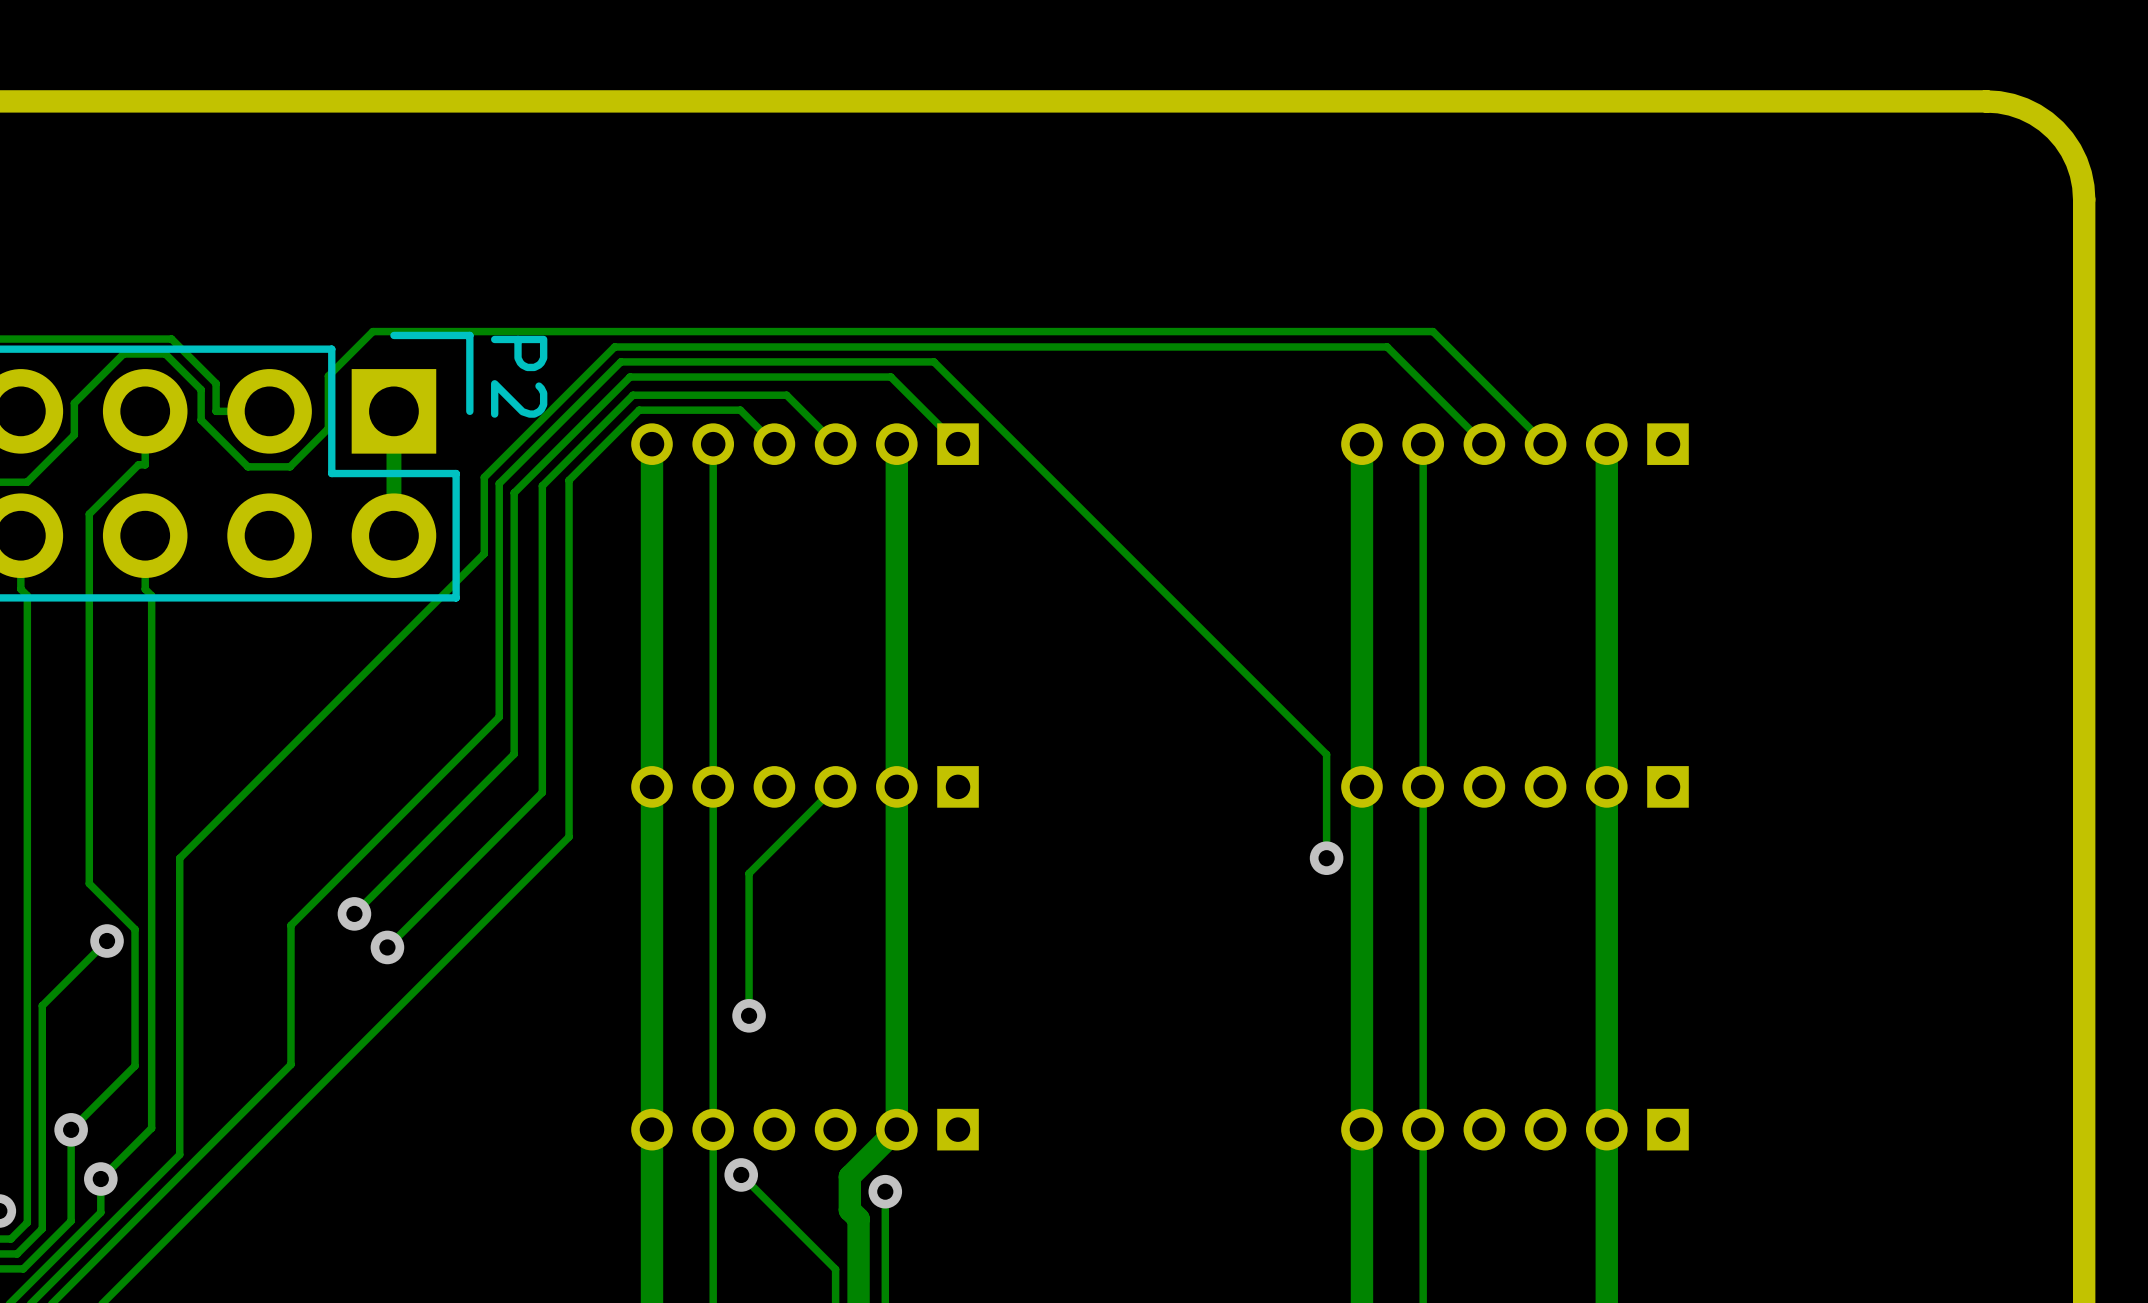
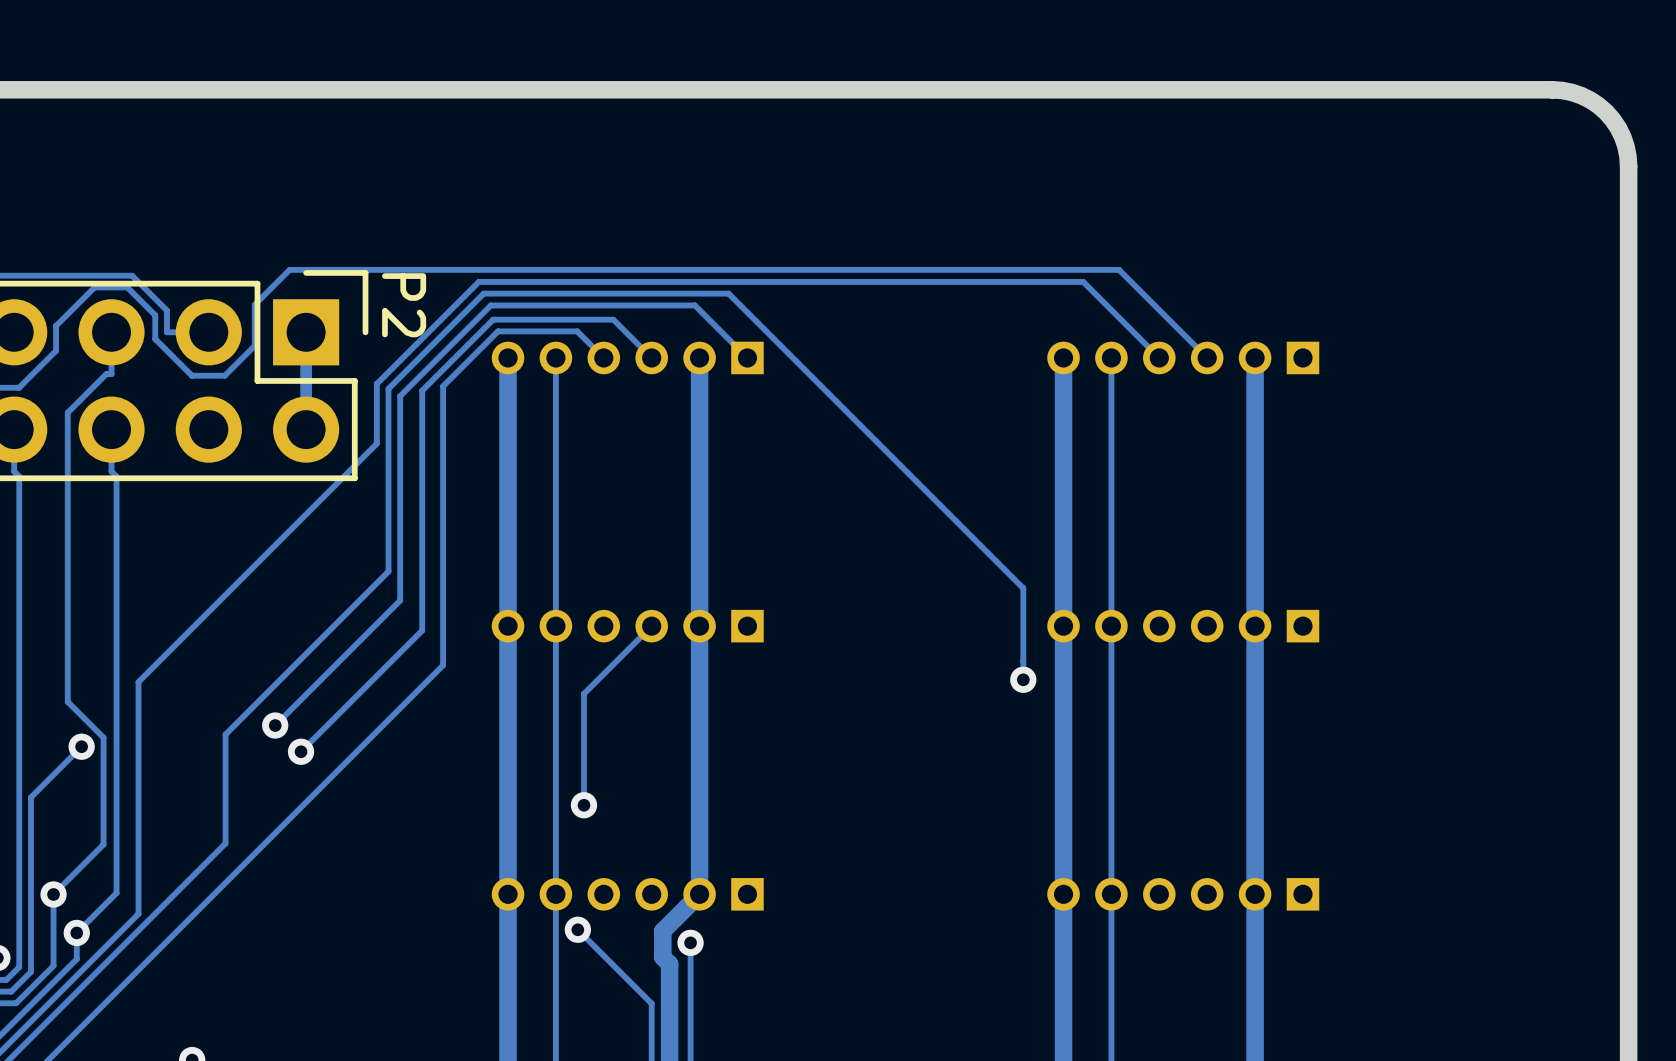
track: (1310, 738) (1326, 754) (1326, 858) -> (1023, 588) (1023, 679)
via position: (1326, 858) -> (1023, 679)

